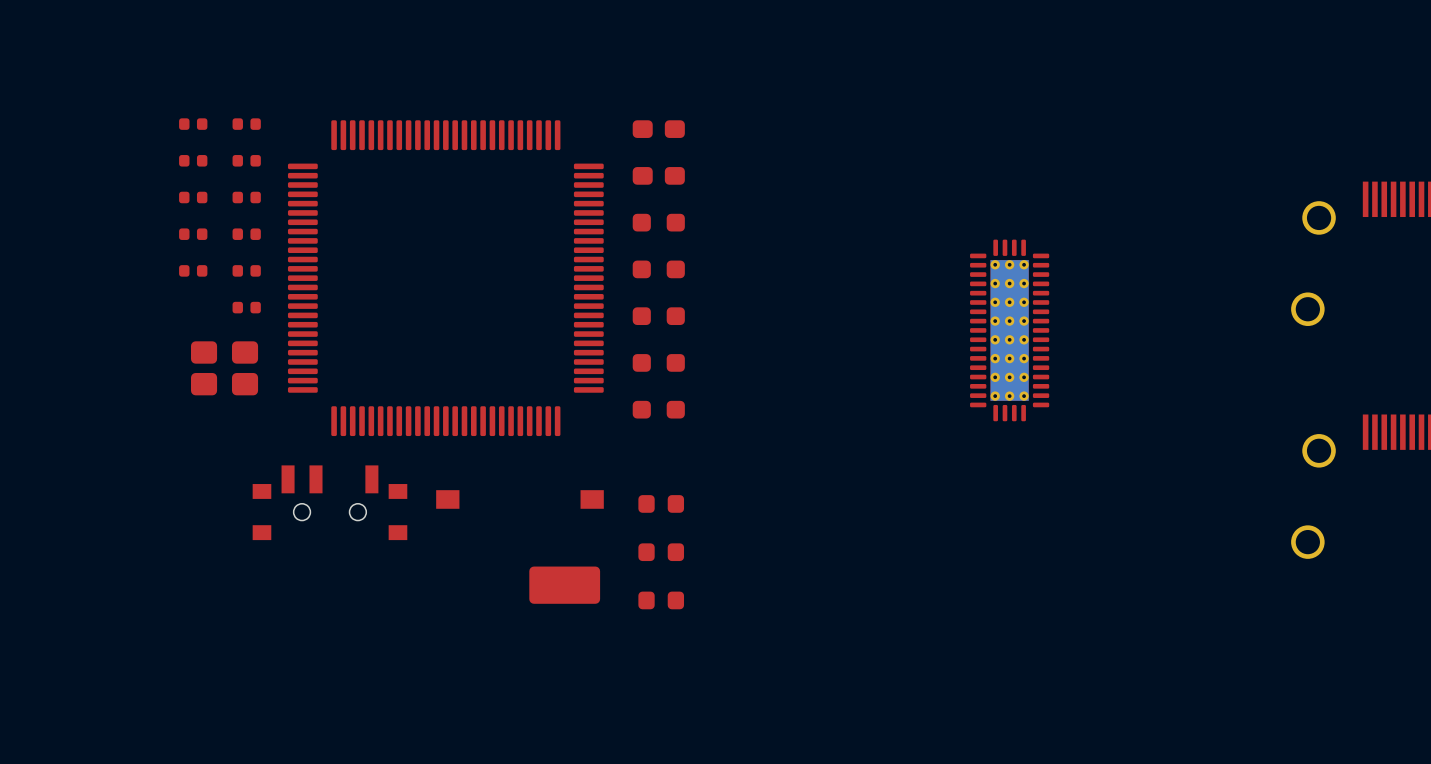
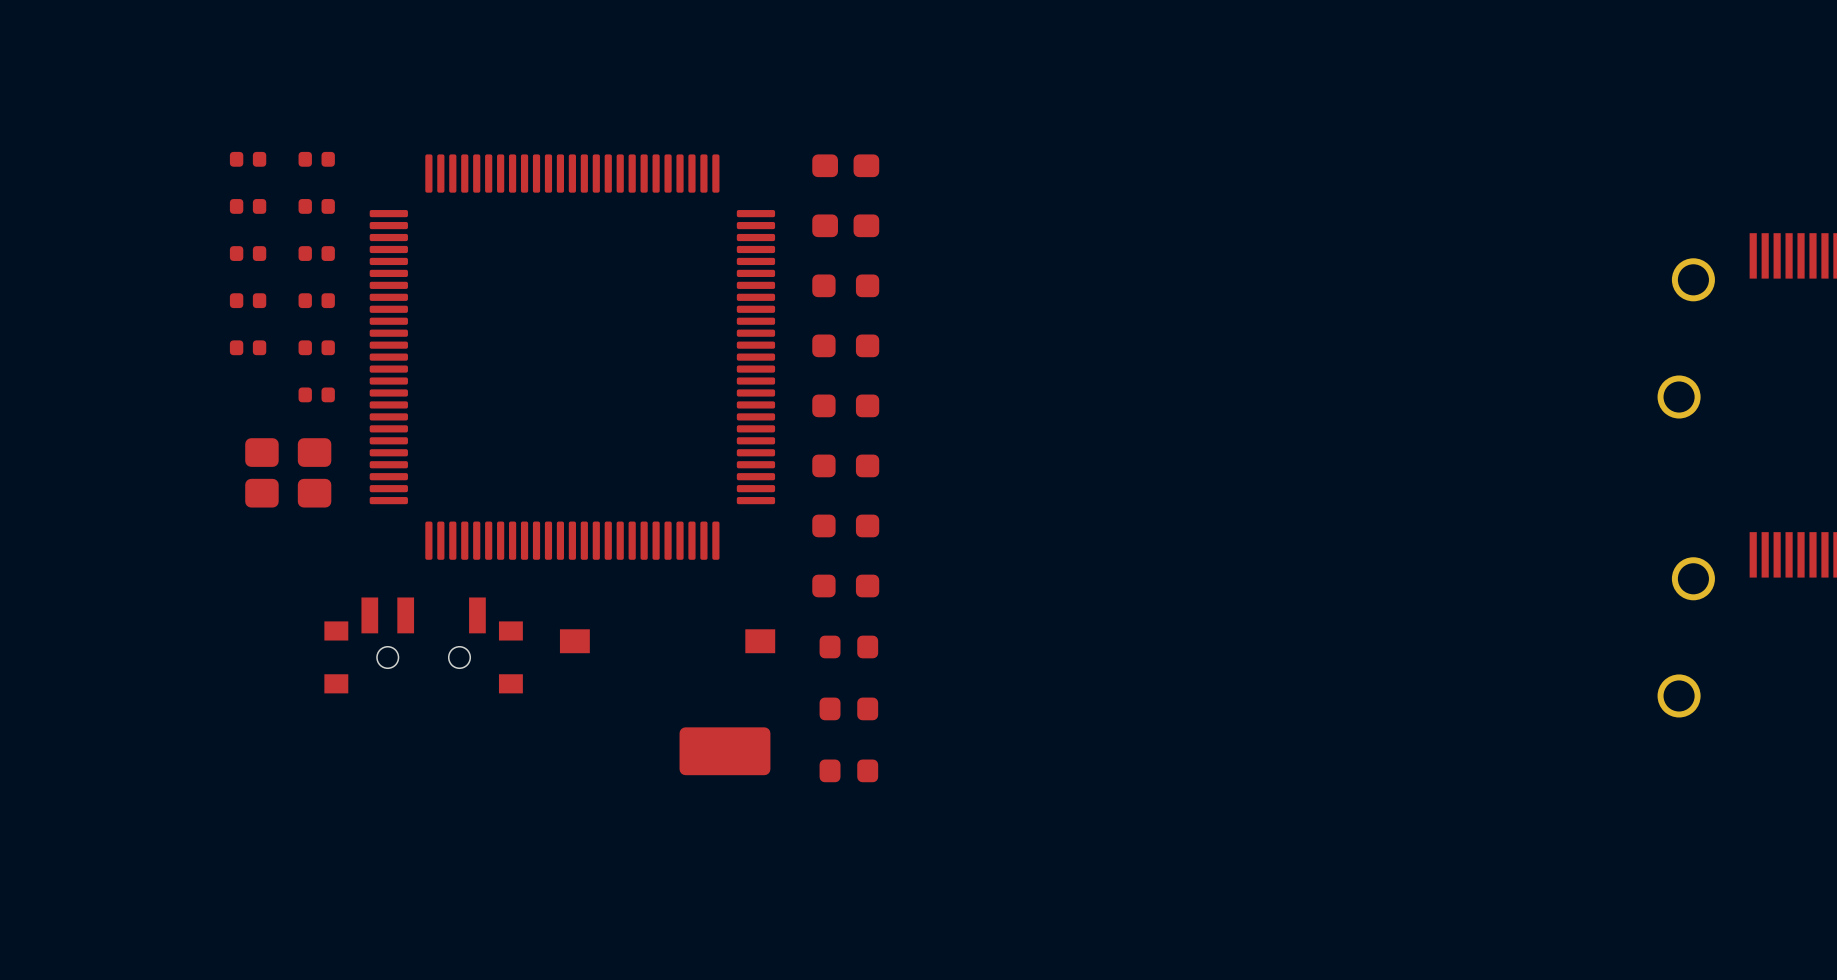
part: (1009, 330) -> none
part: none -> (845, 585)

